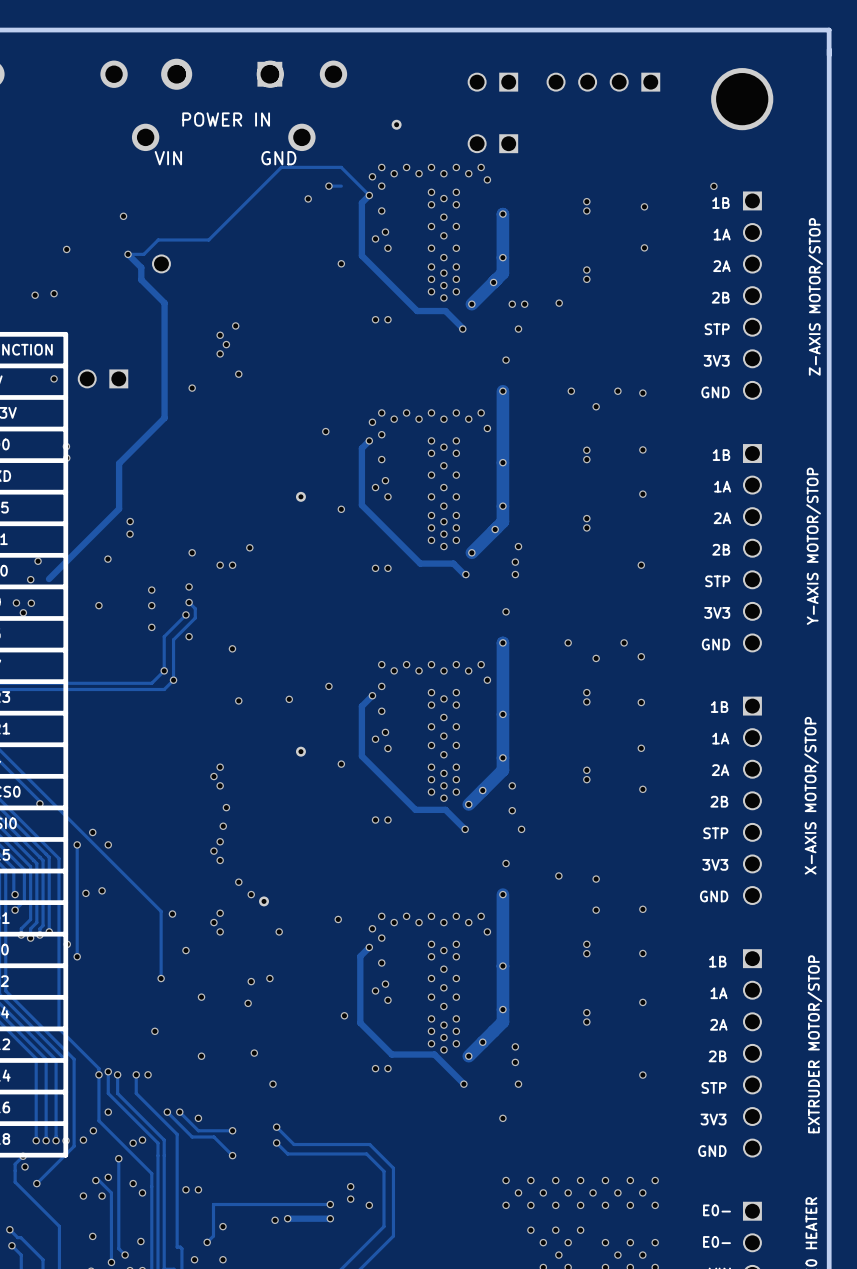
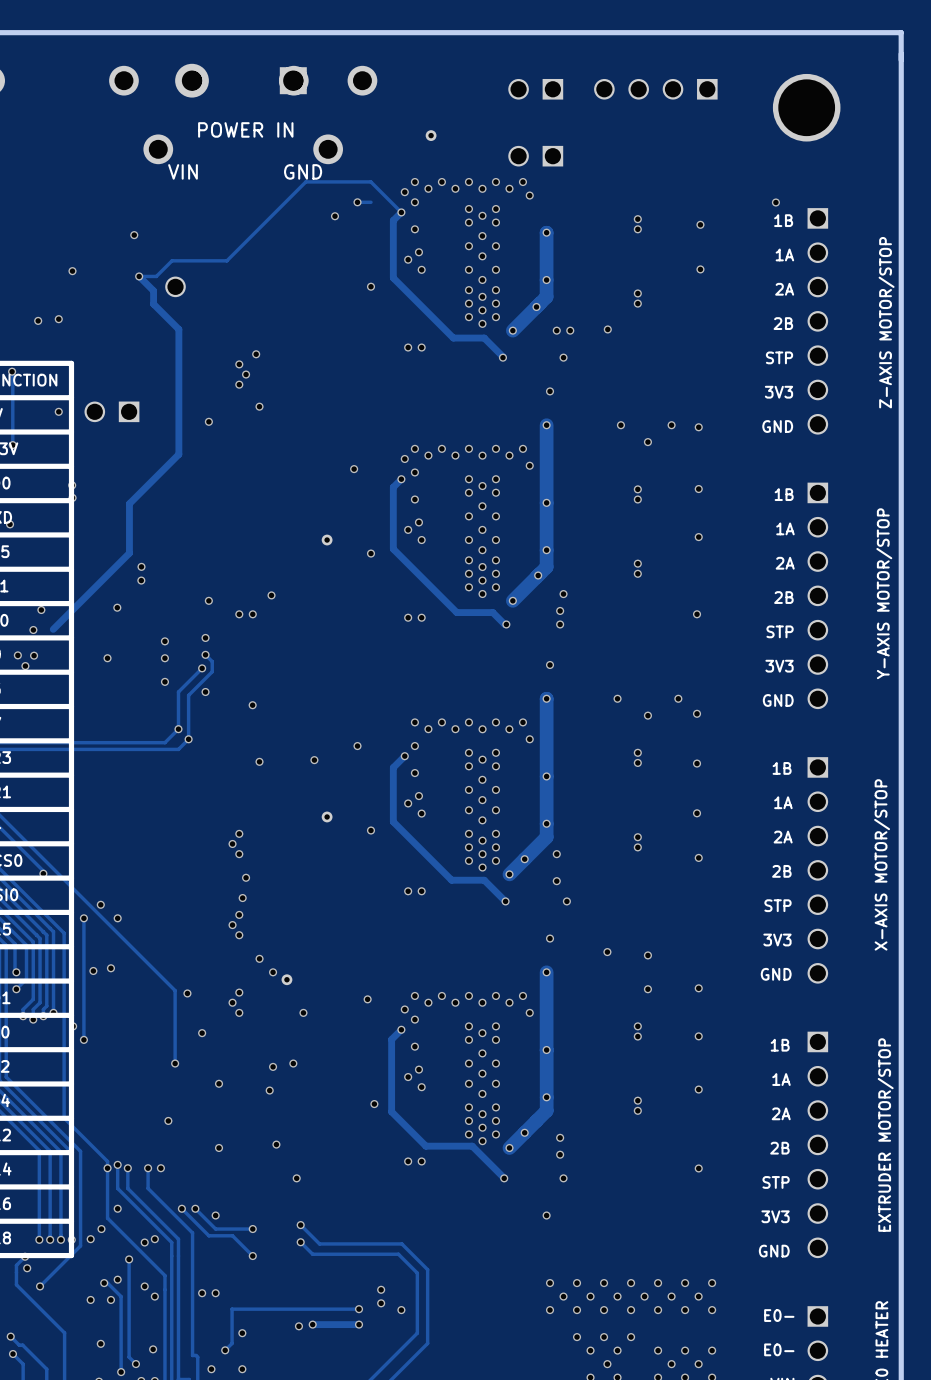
track: none -> (12, 371) (12, 445)
via: none -> (12, 371)
via: none -> (12, 445)
via: none -> (10, 524)

